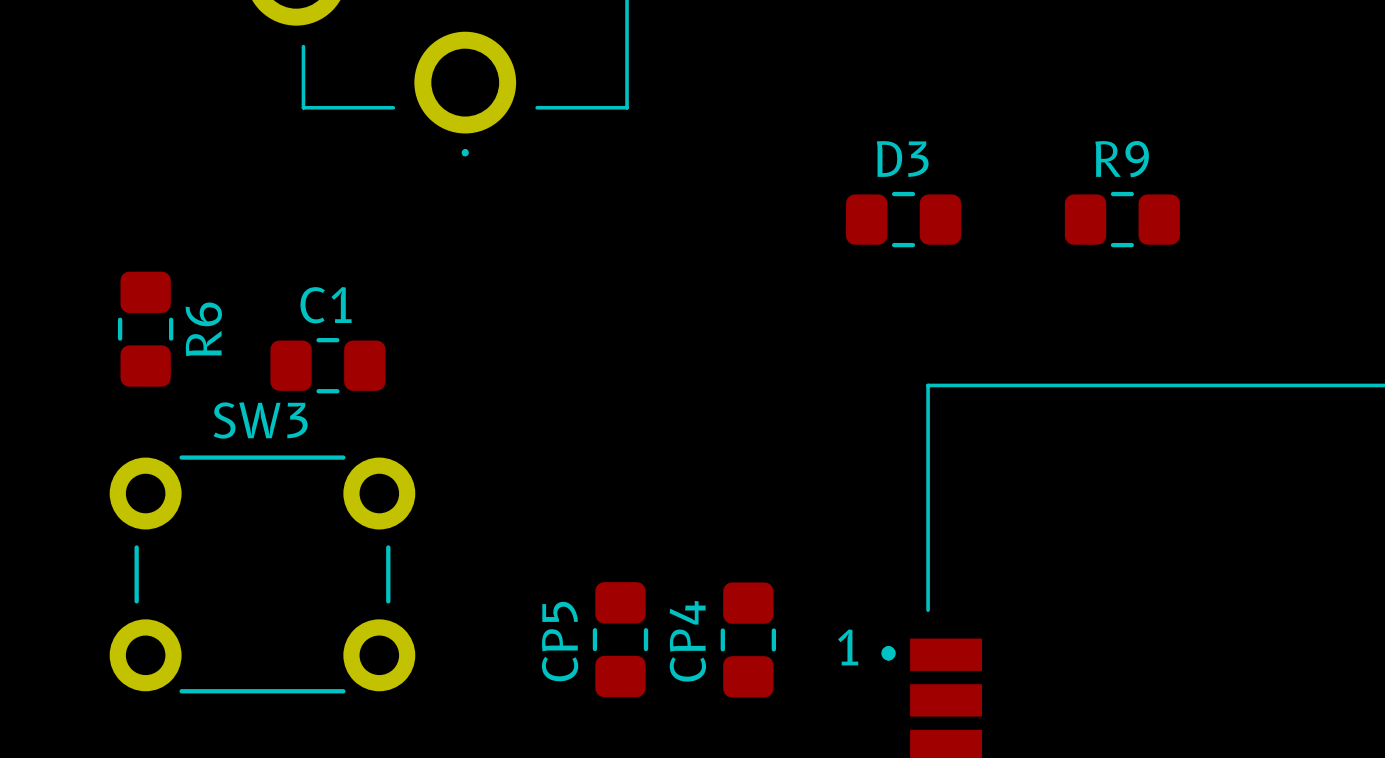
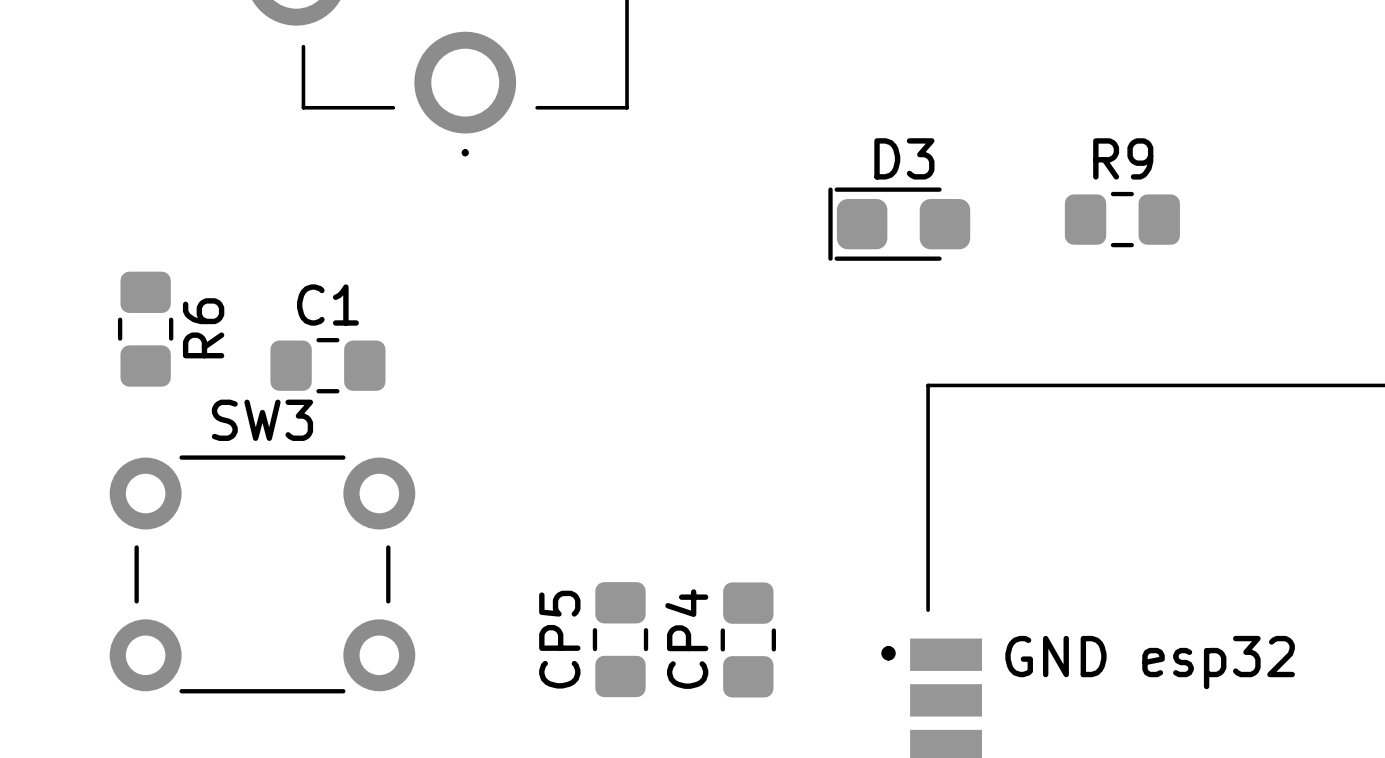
D3 footprint: [846, 191, 962, 248] -> [828, 187, 971, 261]
text: 1 (848, 647) -> none
text: none -> GND esp32 (1150, 662)

